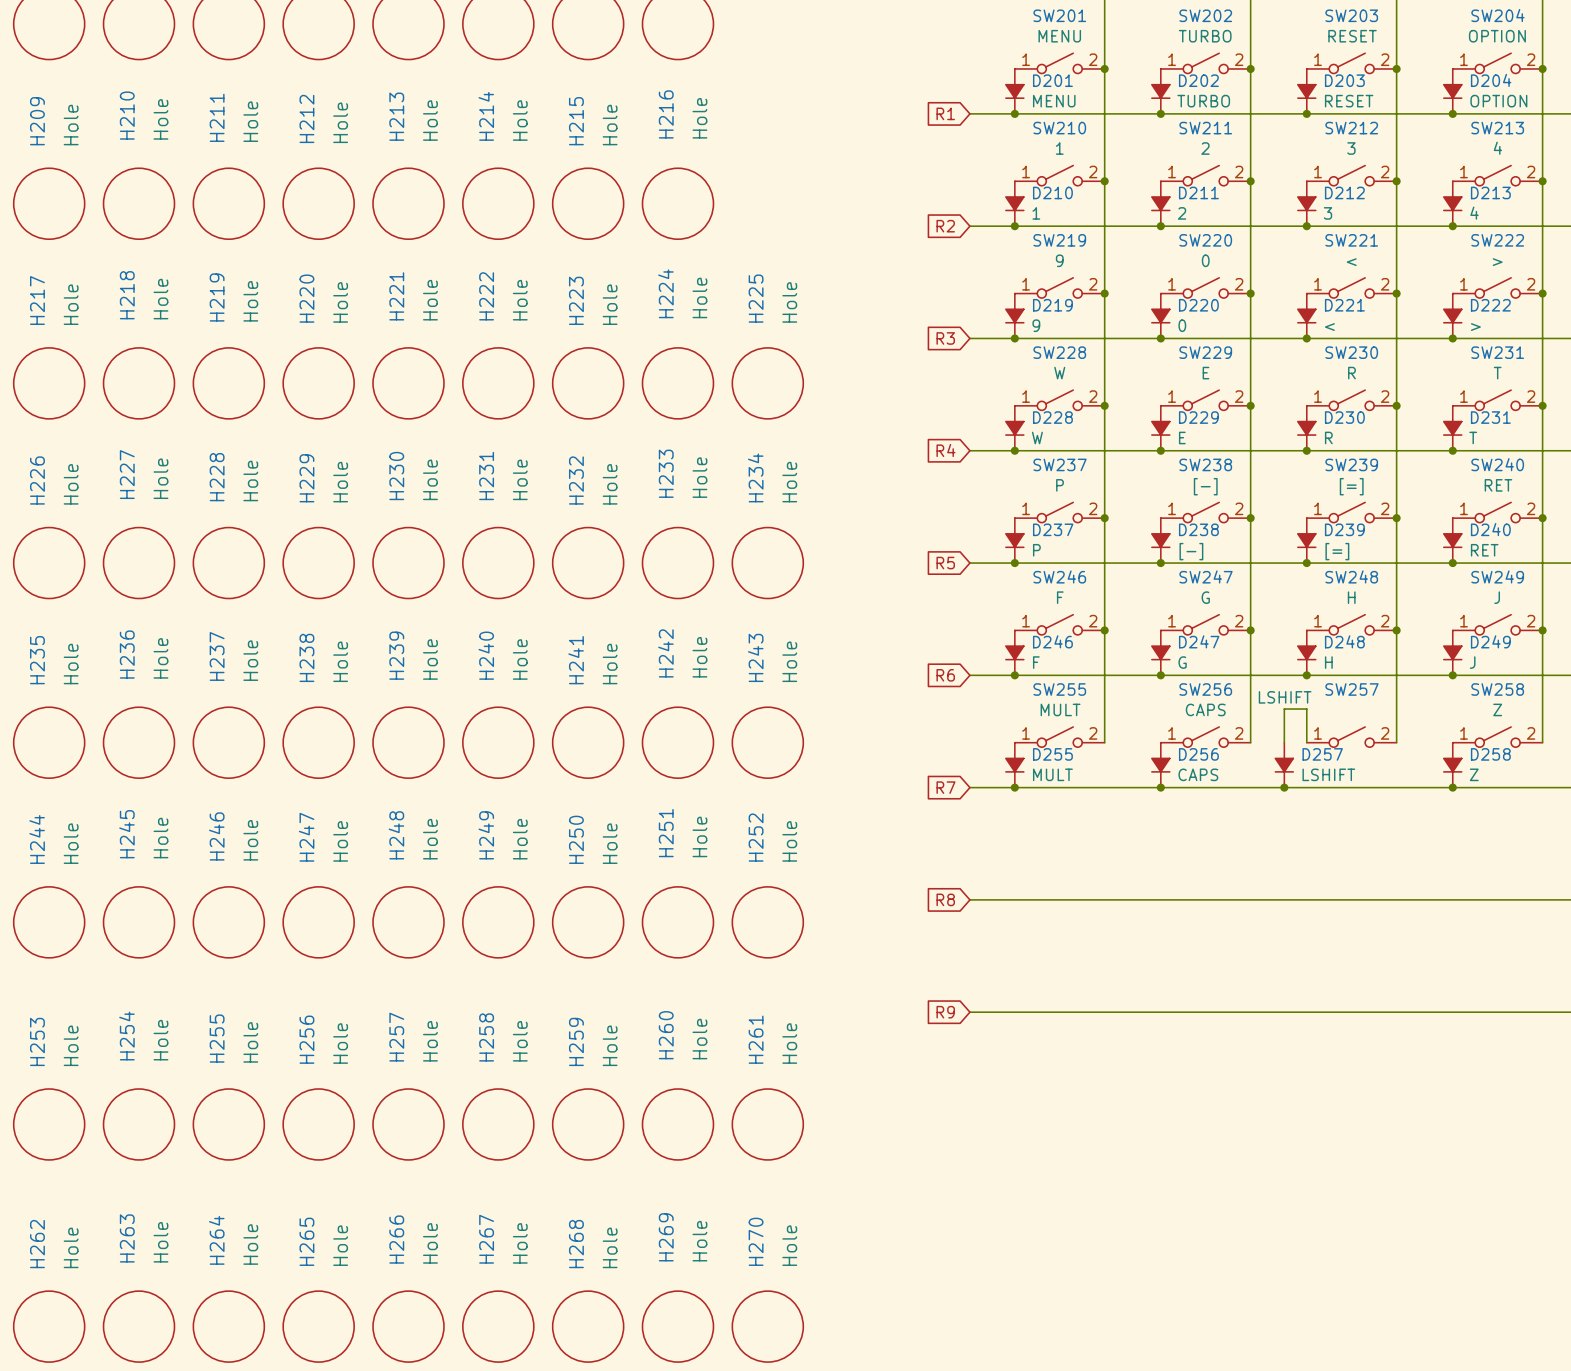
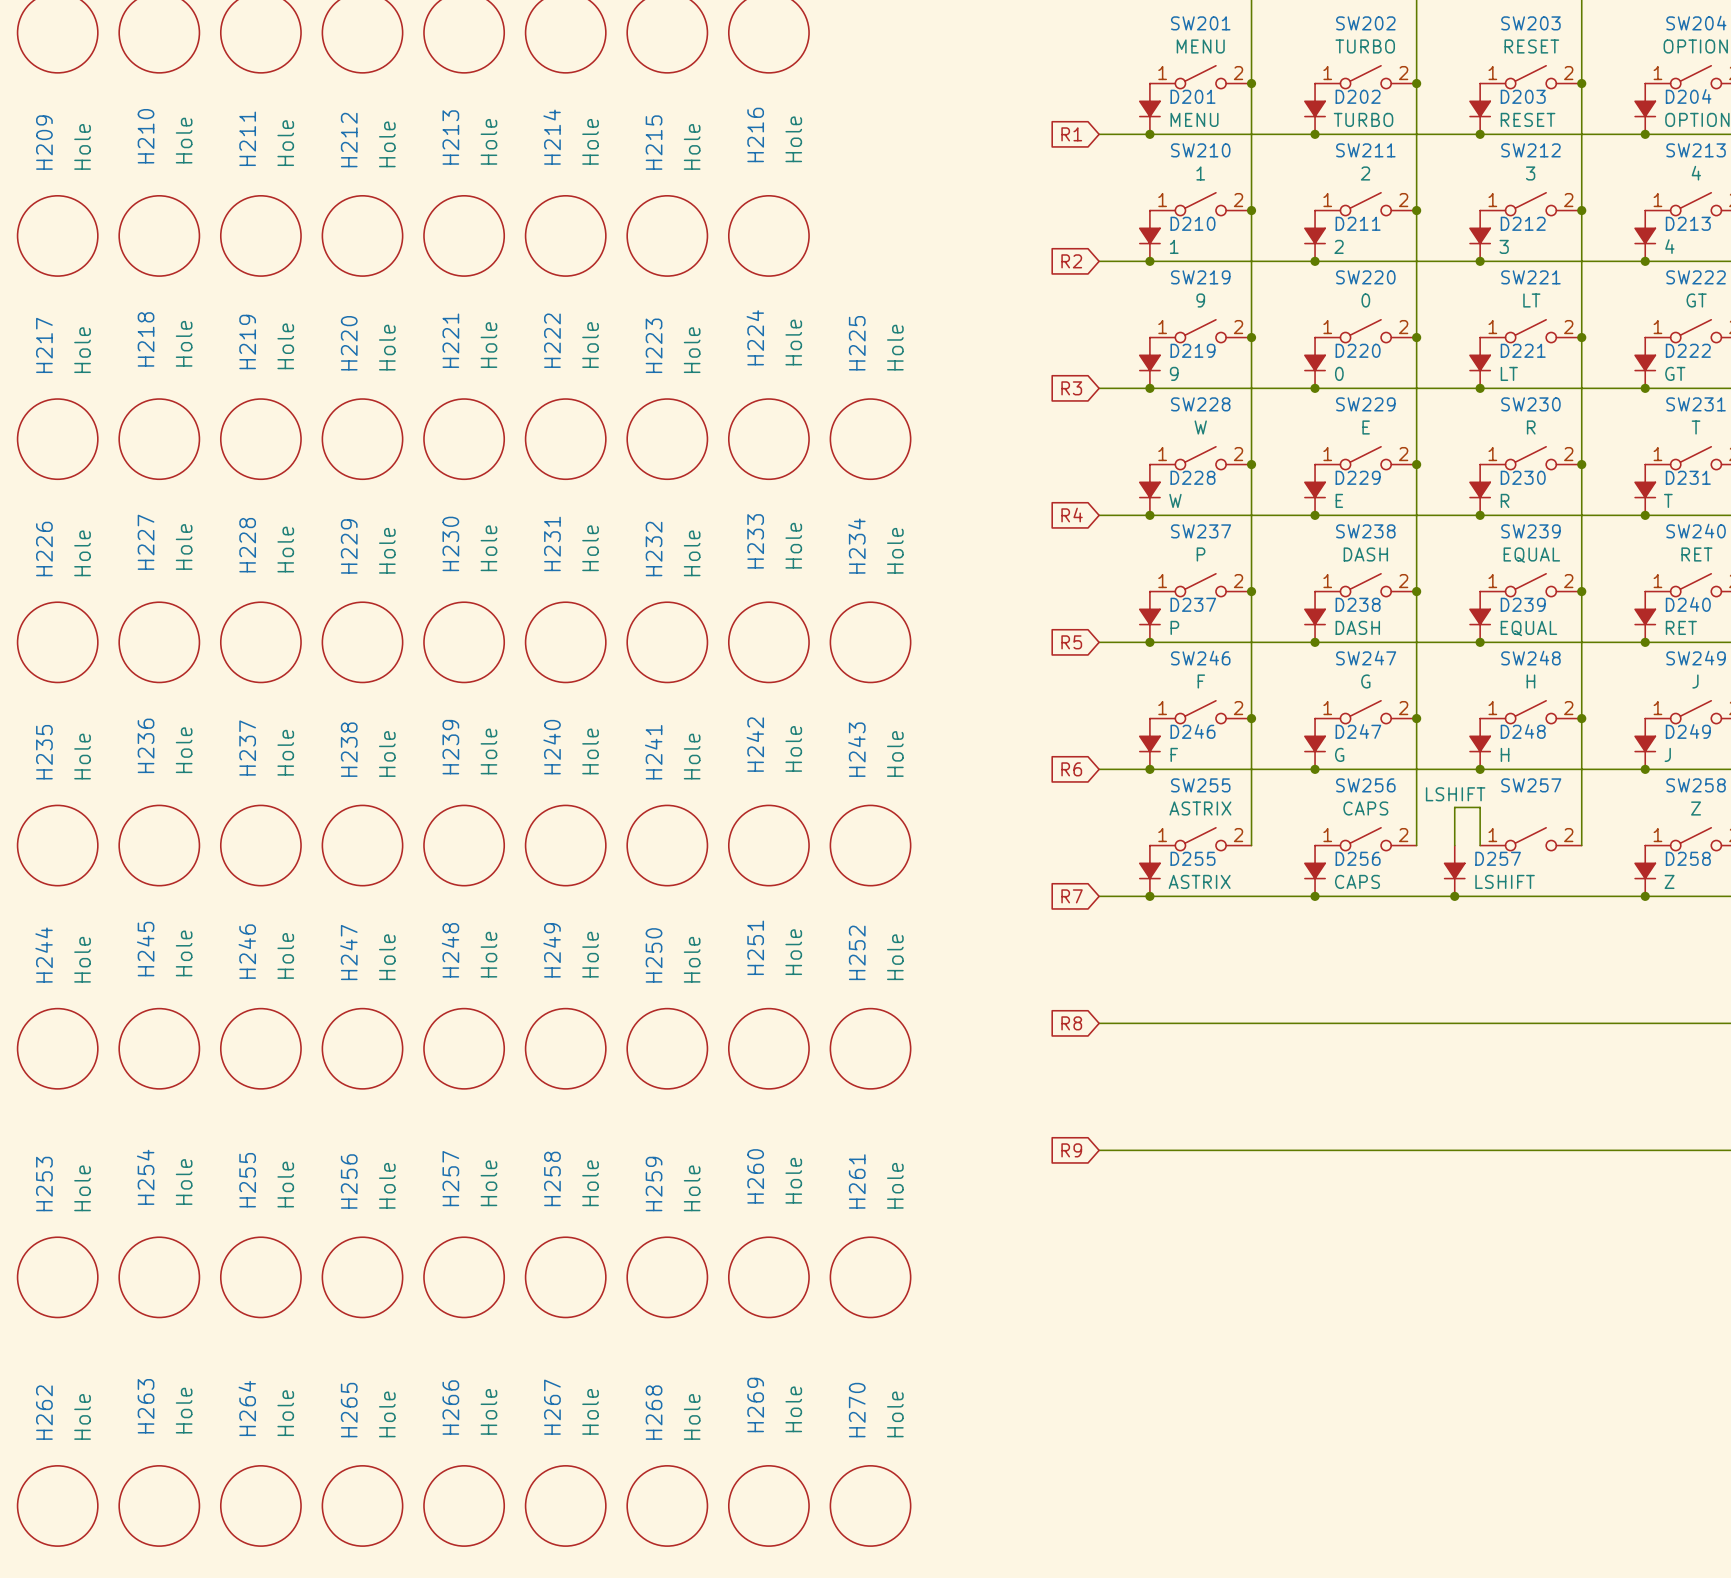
SW221 value: < (1351, 262) -> LT (1531, 300)
SW222 value: > (1497, 262) -> GT (1696, 300)
D221 value: < (1329, 327) -> LT (1509, 373)
D222 value: > (1475, 327) -> GT (1675, 373)
SW238 value: [-] (1205, 486) -> DASH (1365, 554)
SW239 value: [=] (1351, 486) -> EQUAL (1531, 555)
D238 value: [-] (1191, 551) -> DASH (1357, 627)
D239 value: [=] (1337, 551) -> EQUAL (1528, 628)
SW255 value: MULT (1060, 709) -> ASTRIX (1200, 808)
D255 value: MULT (1052, 774) -> ASTRIX (1199, 881)

